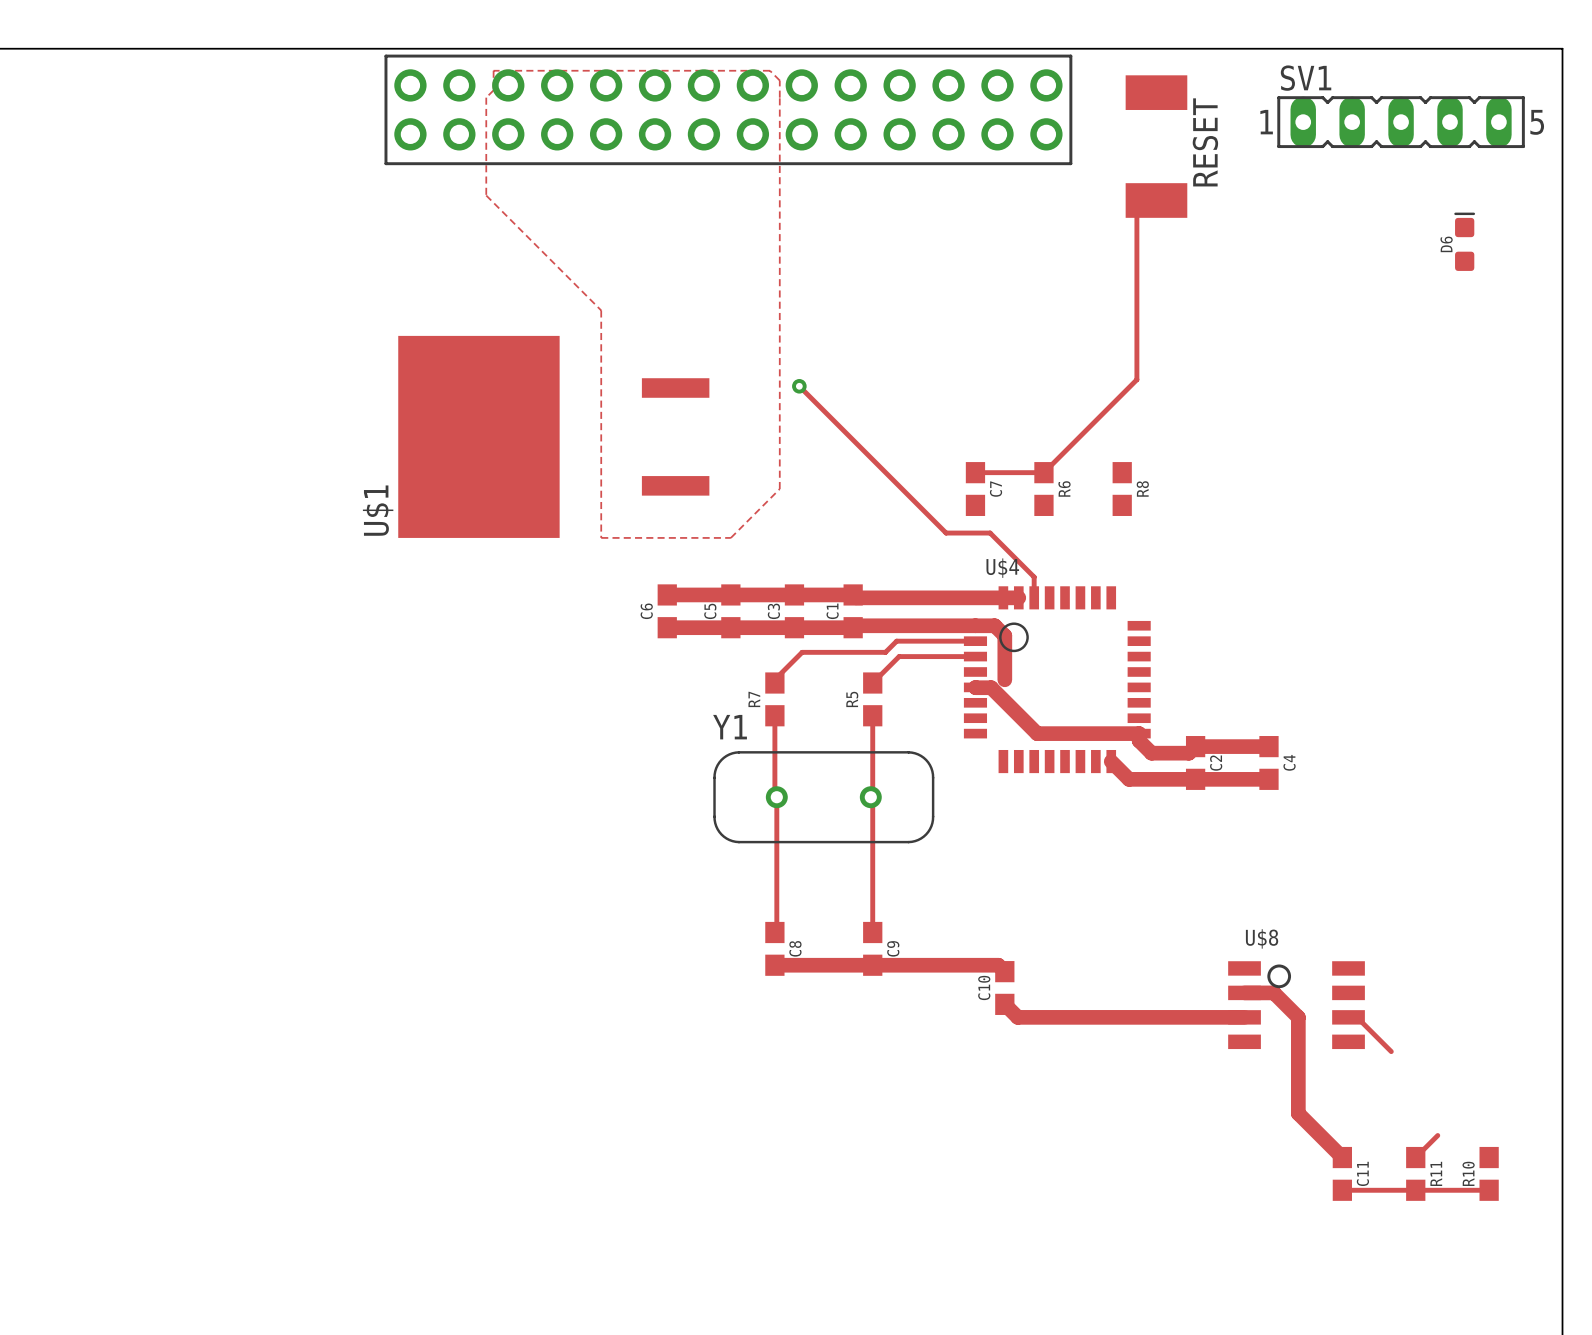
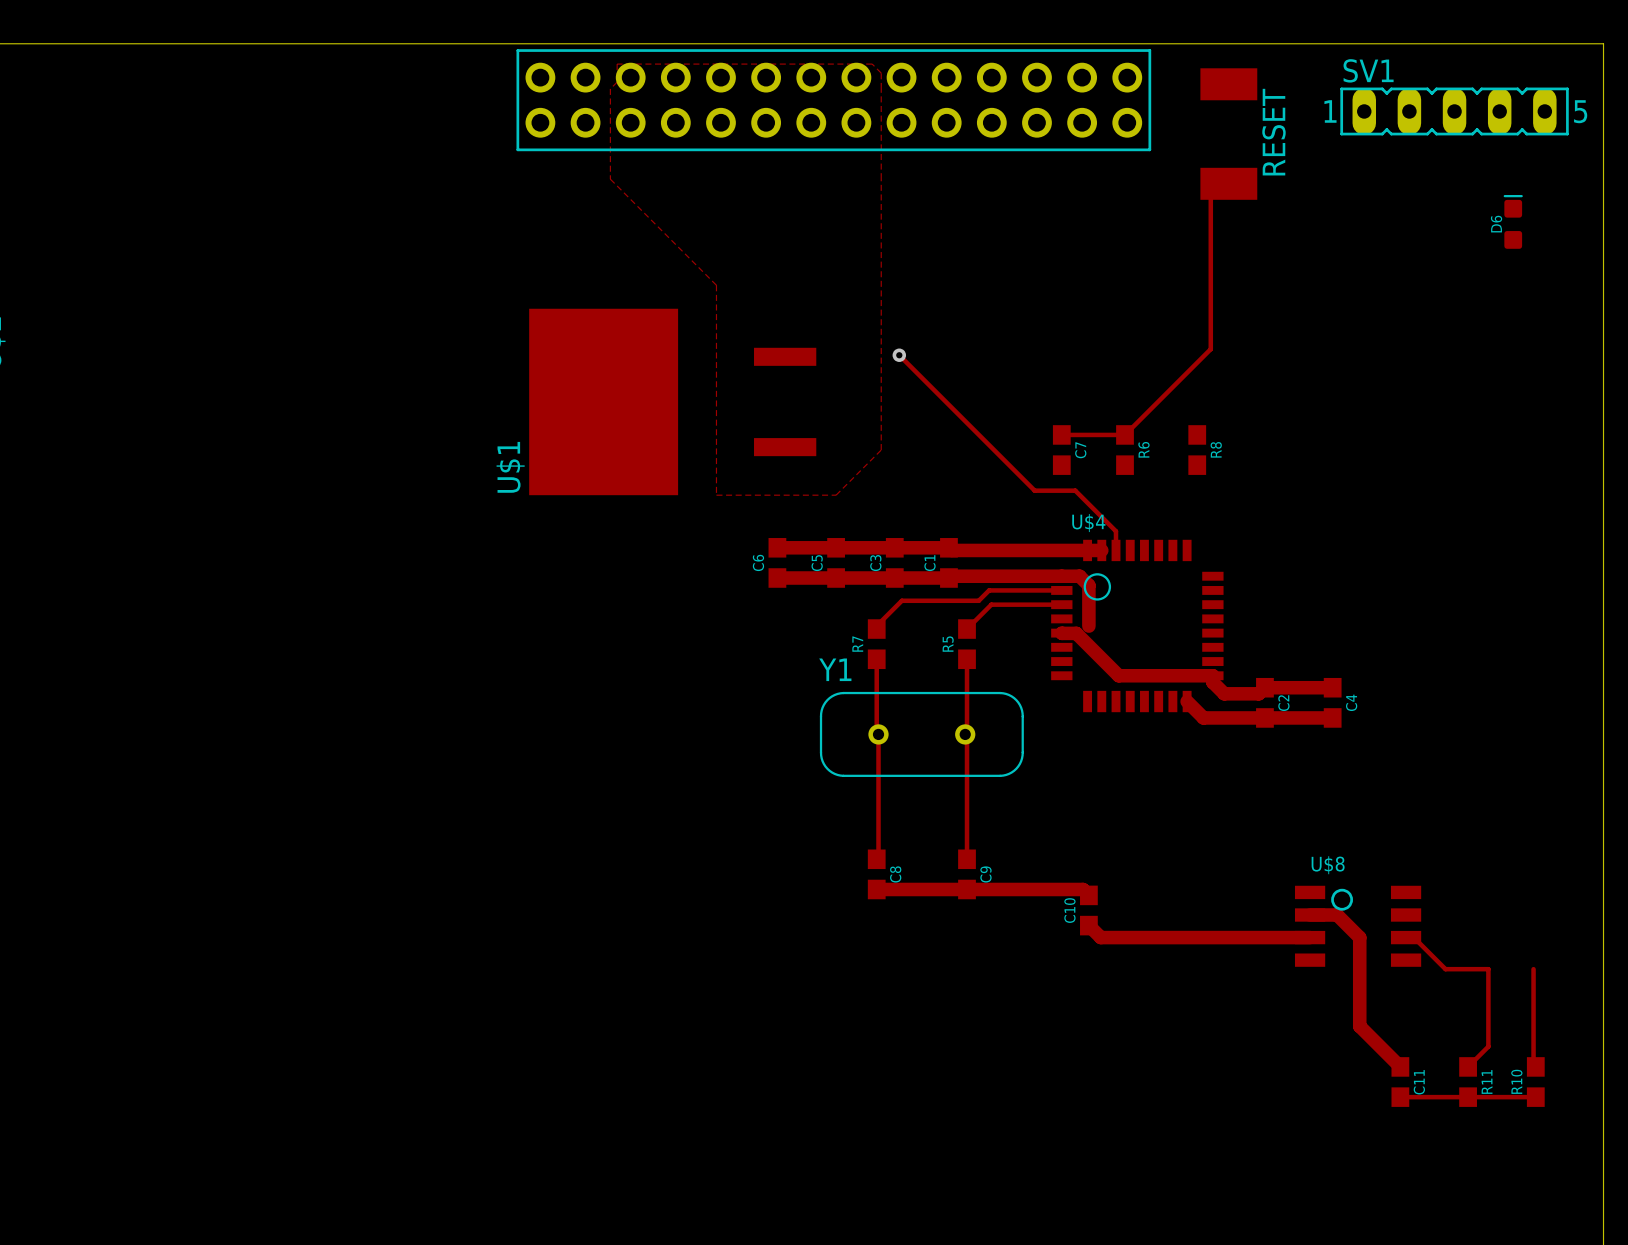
track: none -> (1445, 969) (1488, 969) (1488, 1046)
track: none -> (1533, 969) (1533, 1064)

